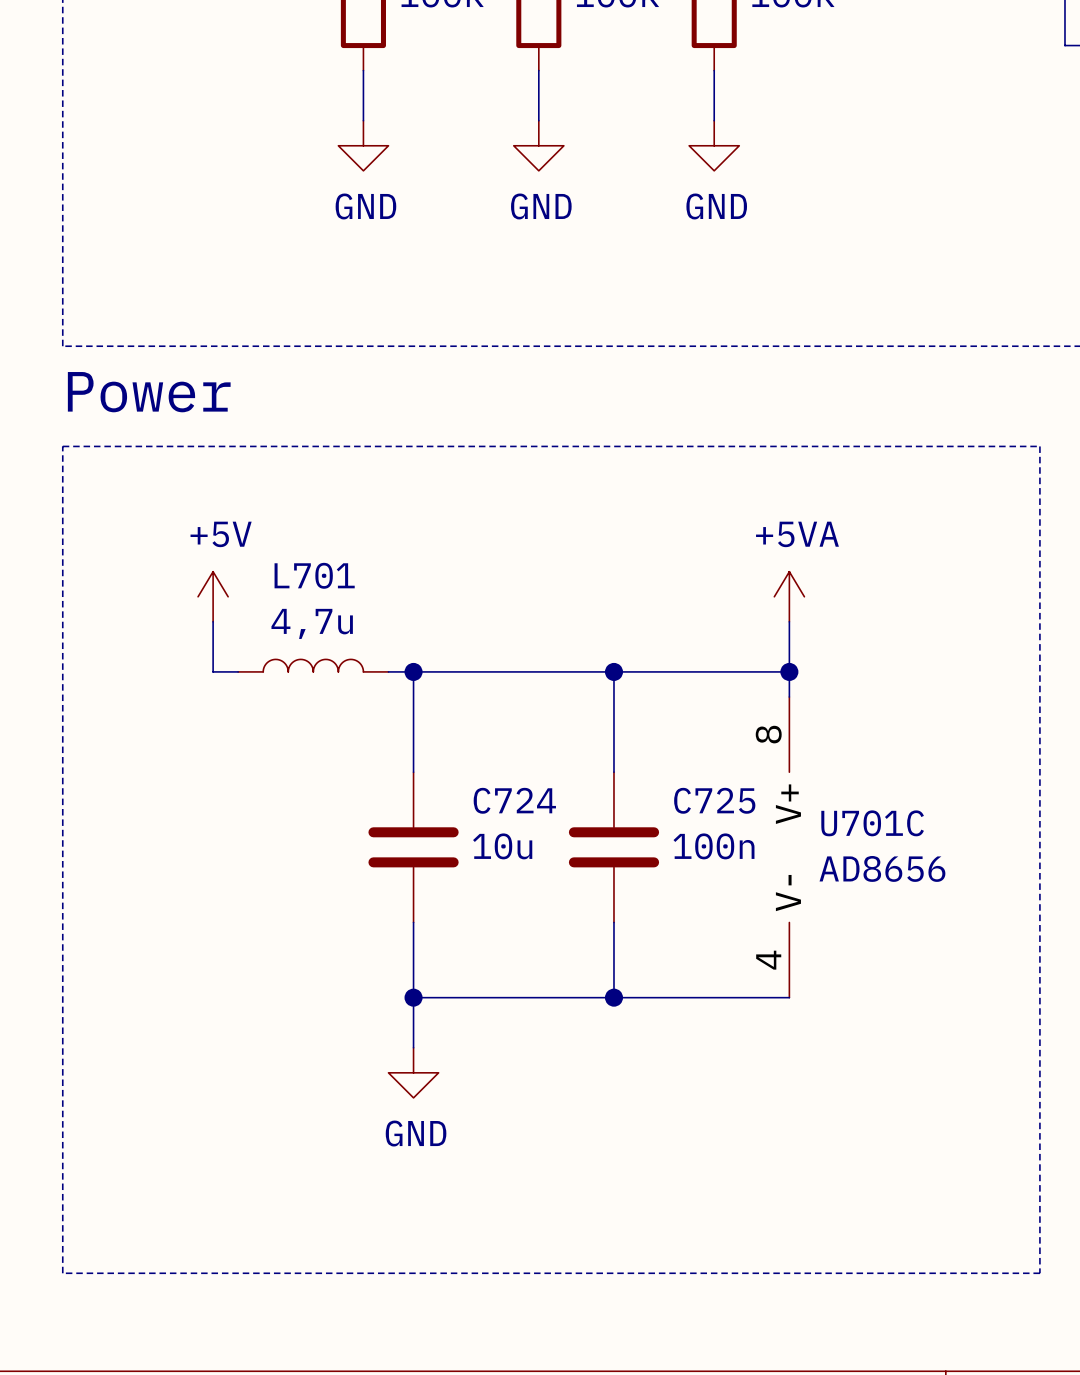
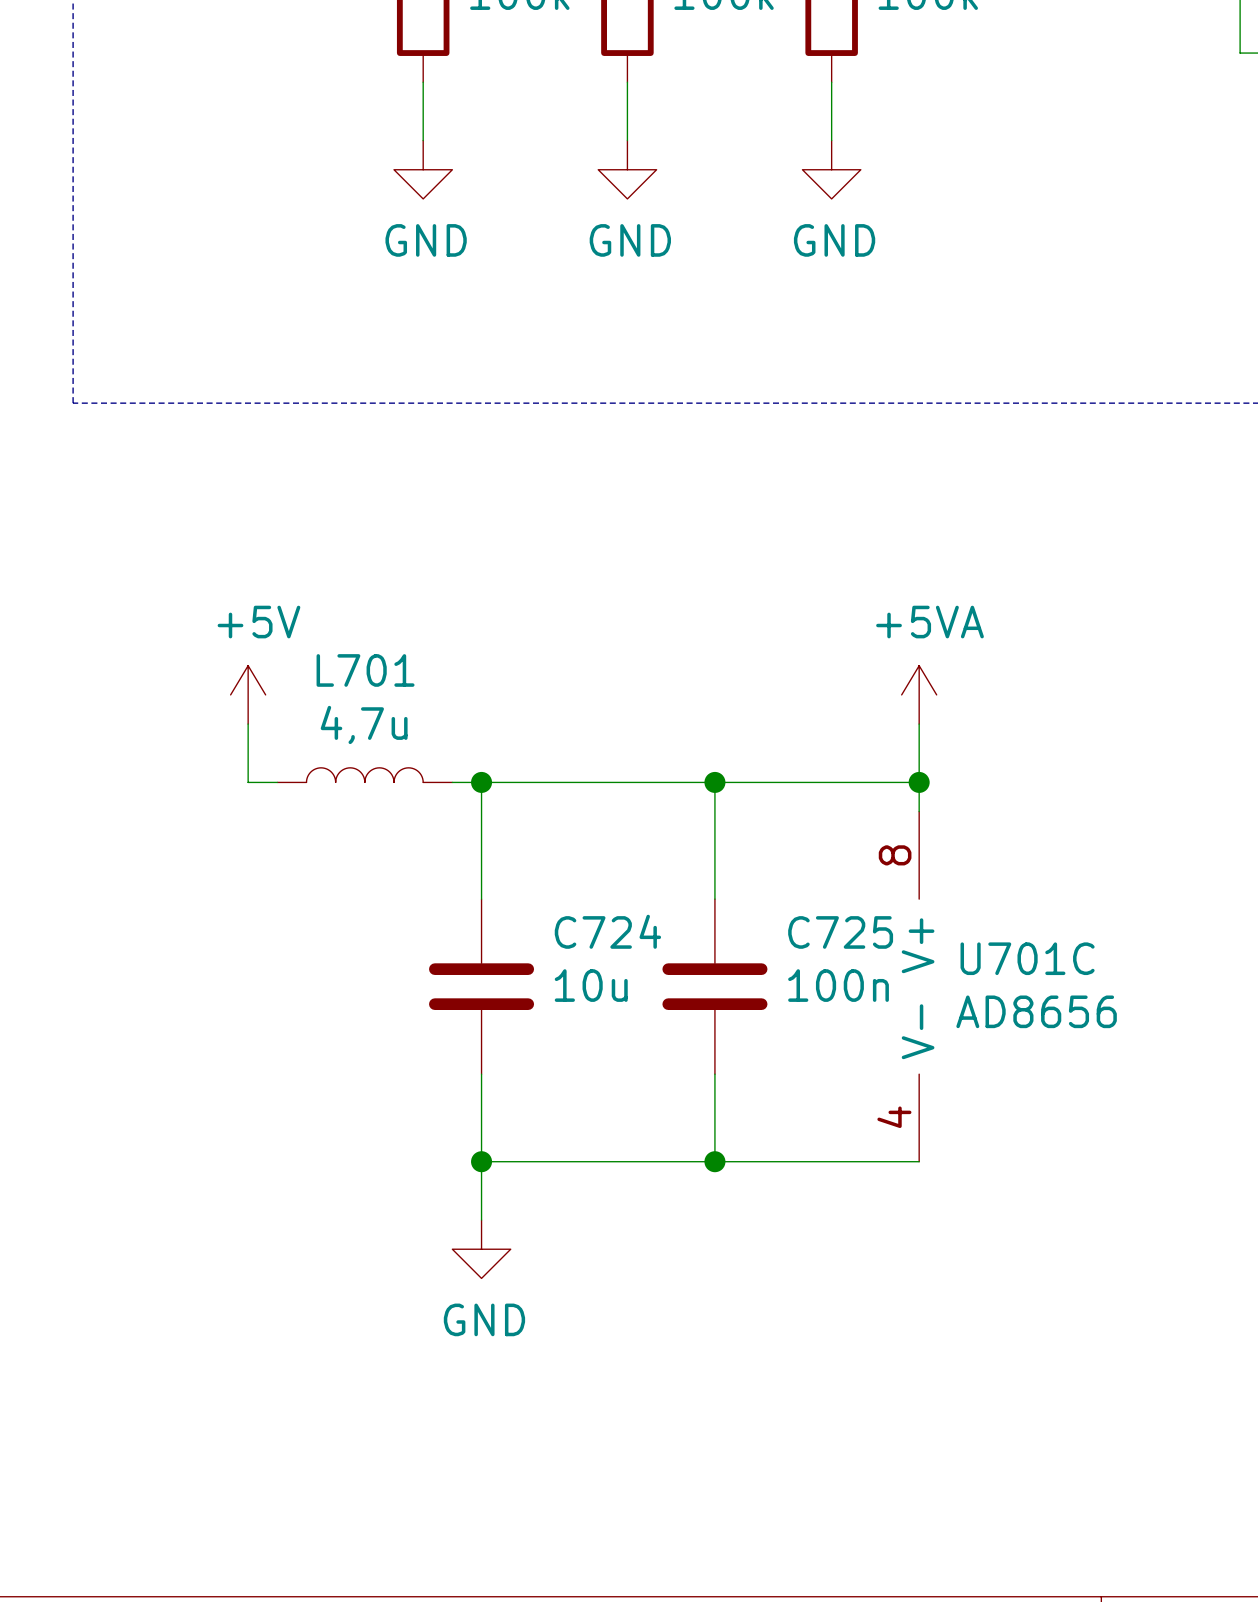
text: Power (149, 392) -> none
line: (62, 446) (1039, 446) (1039, 1273) (62, 1273) (62, 446) -> none

